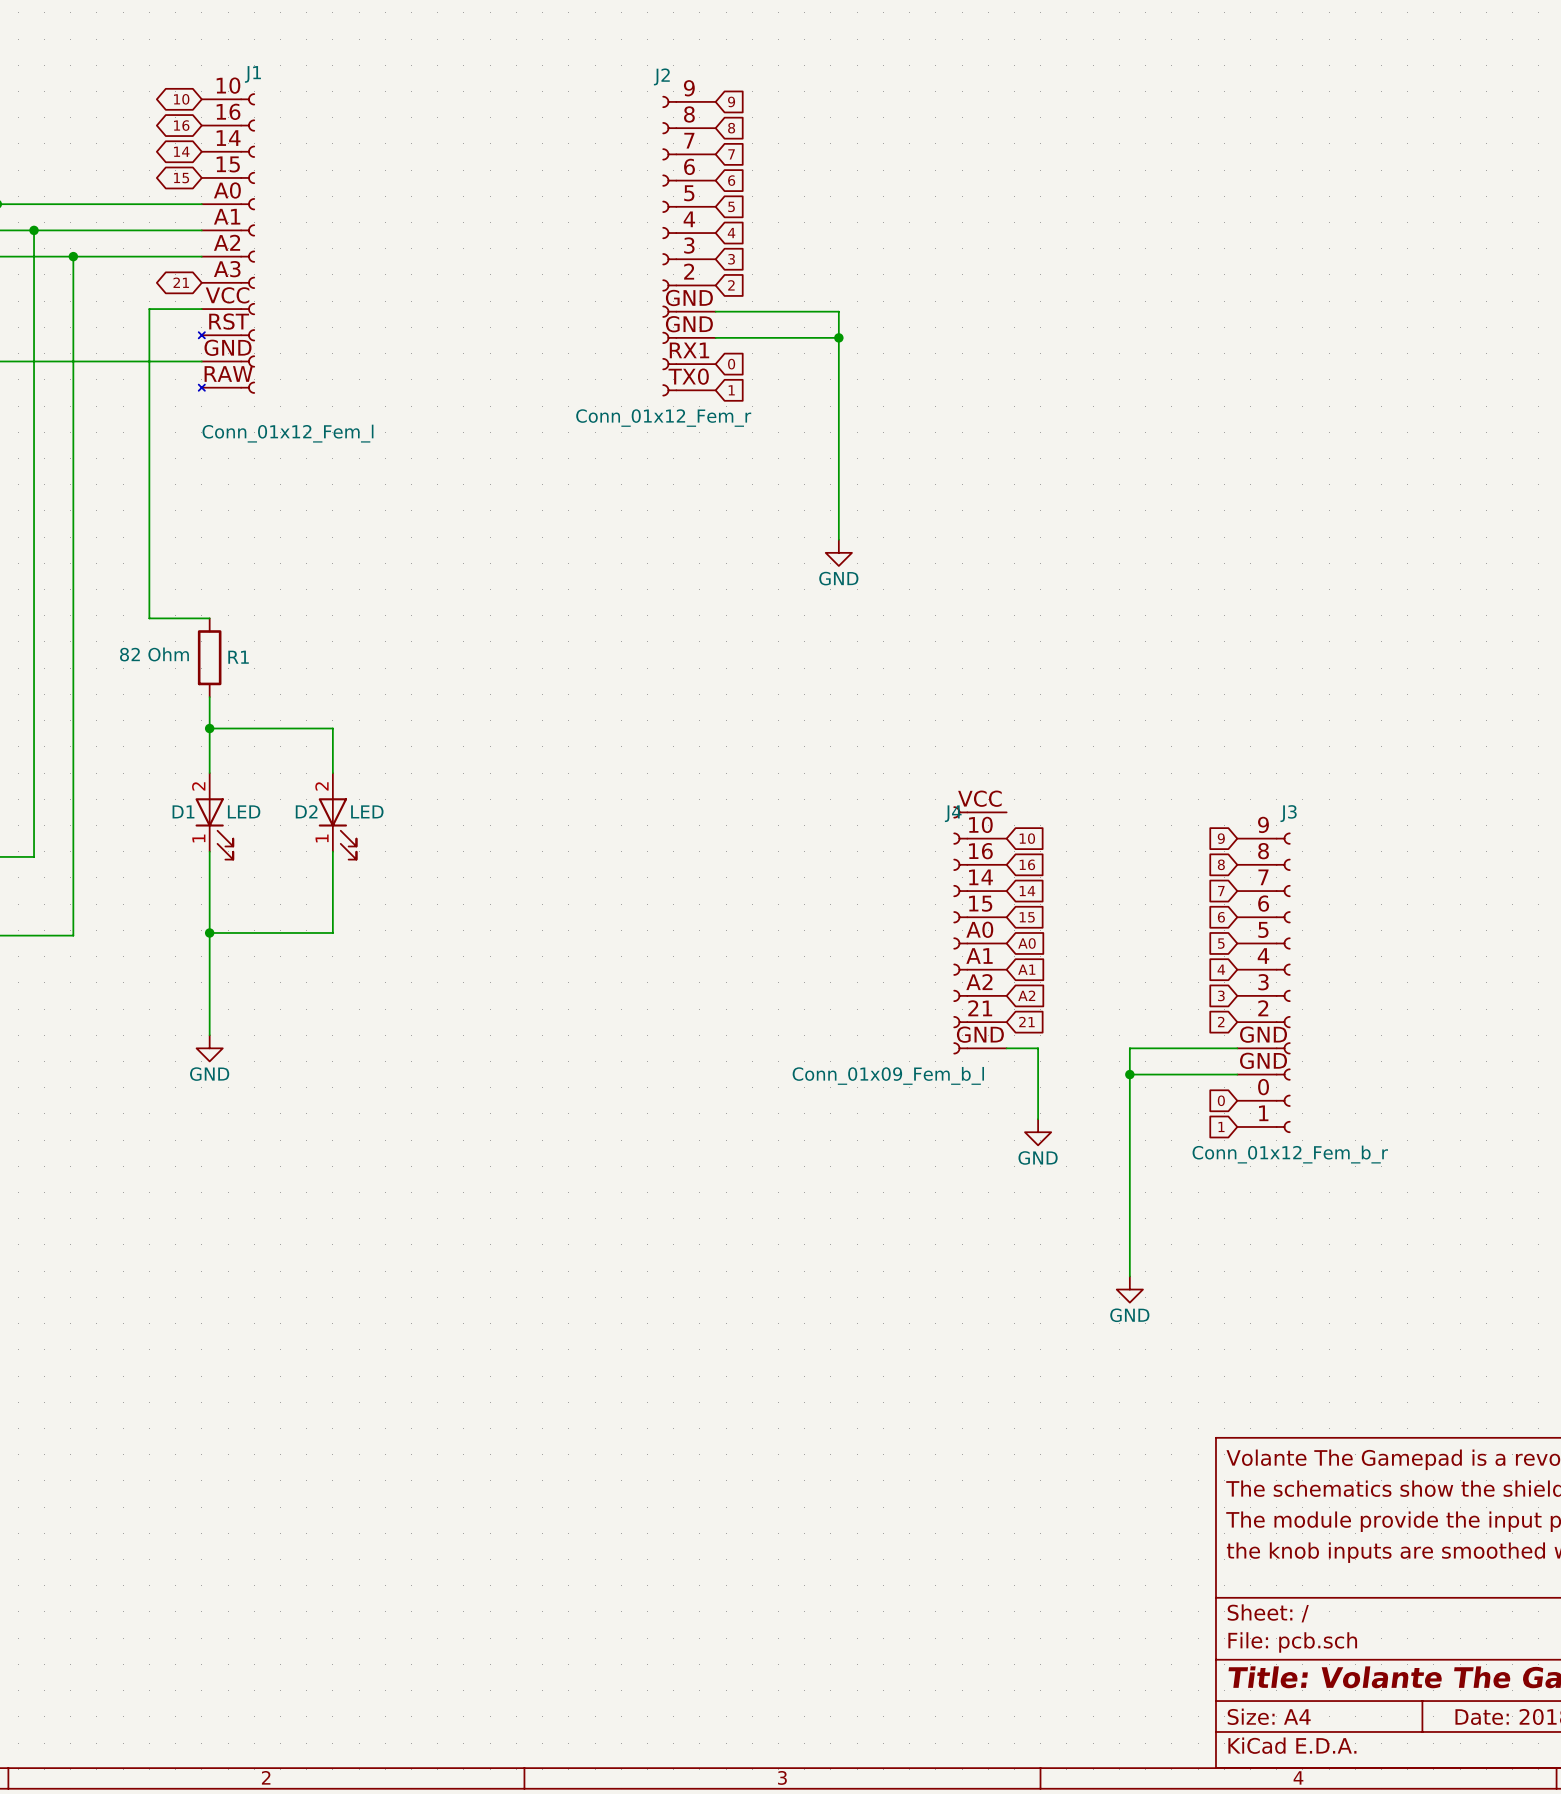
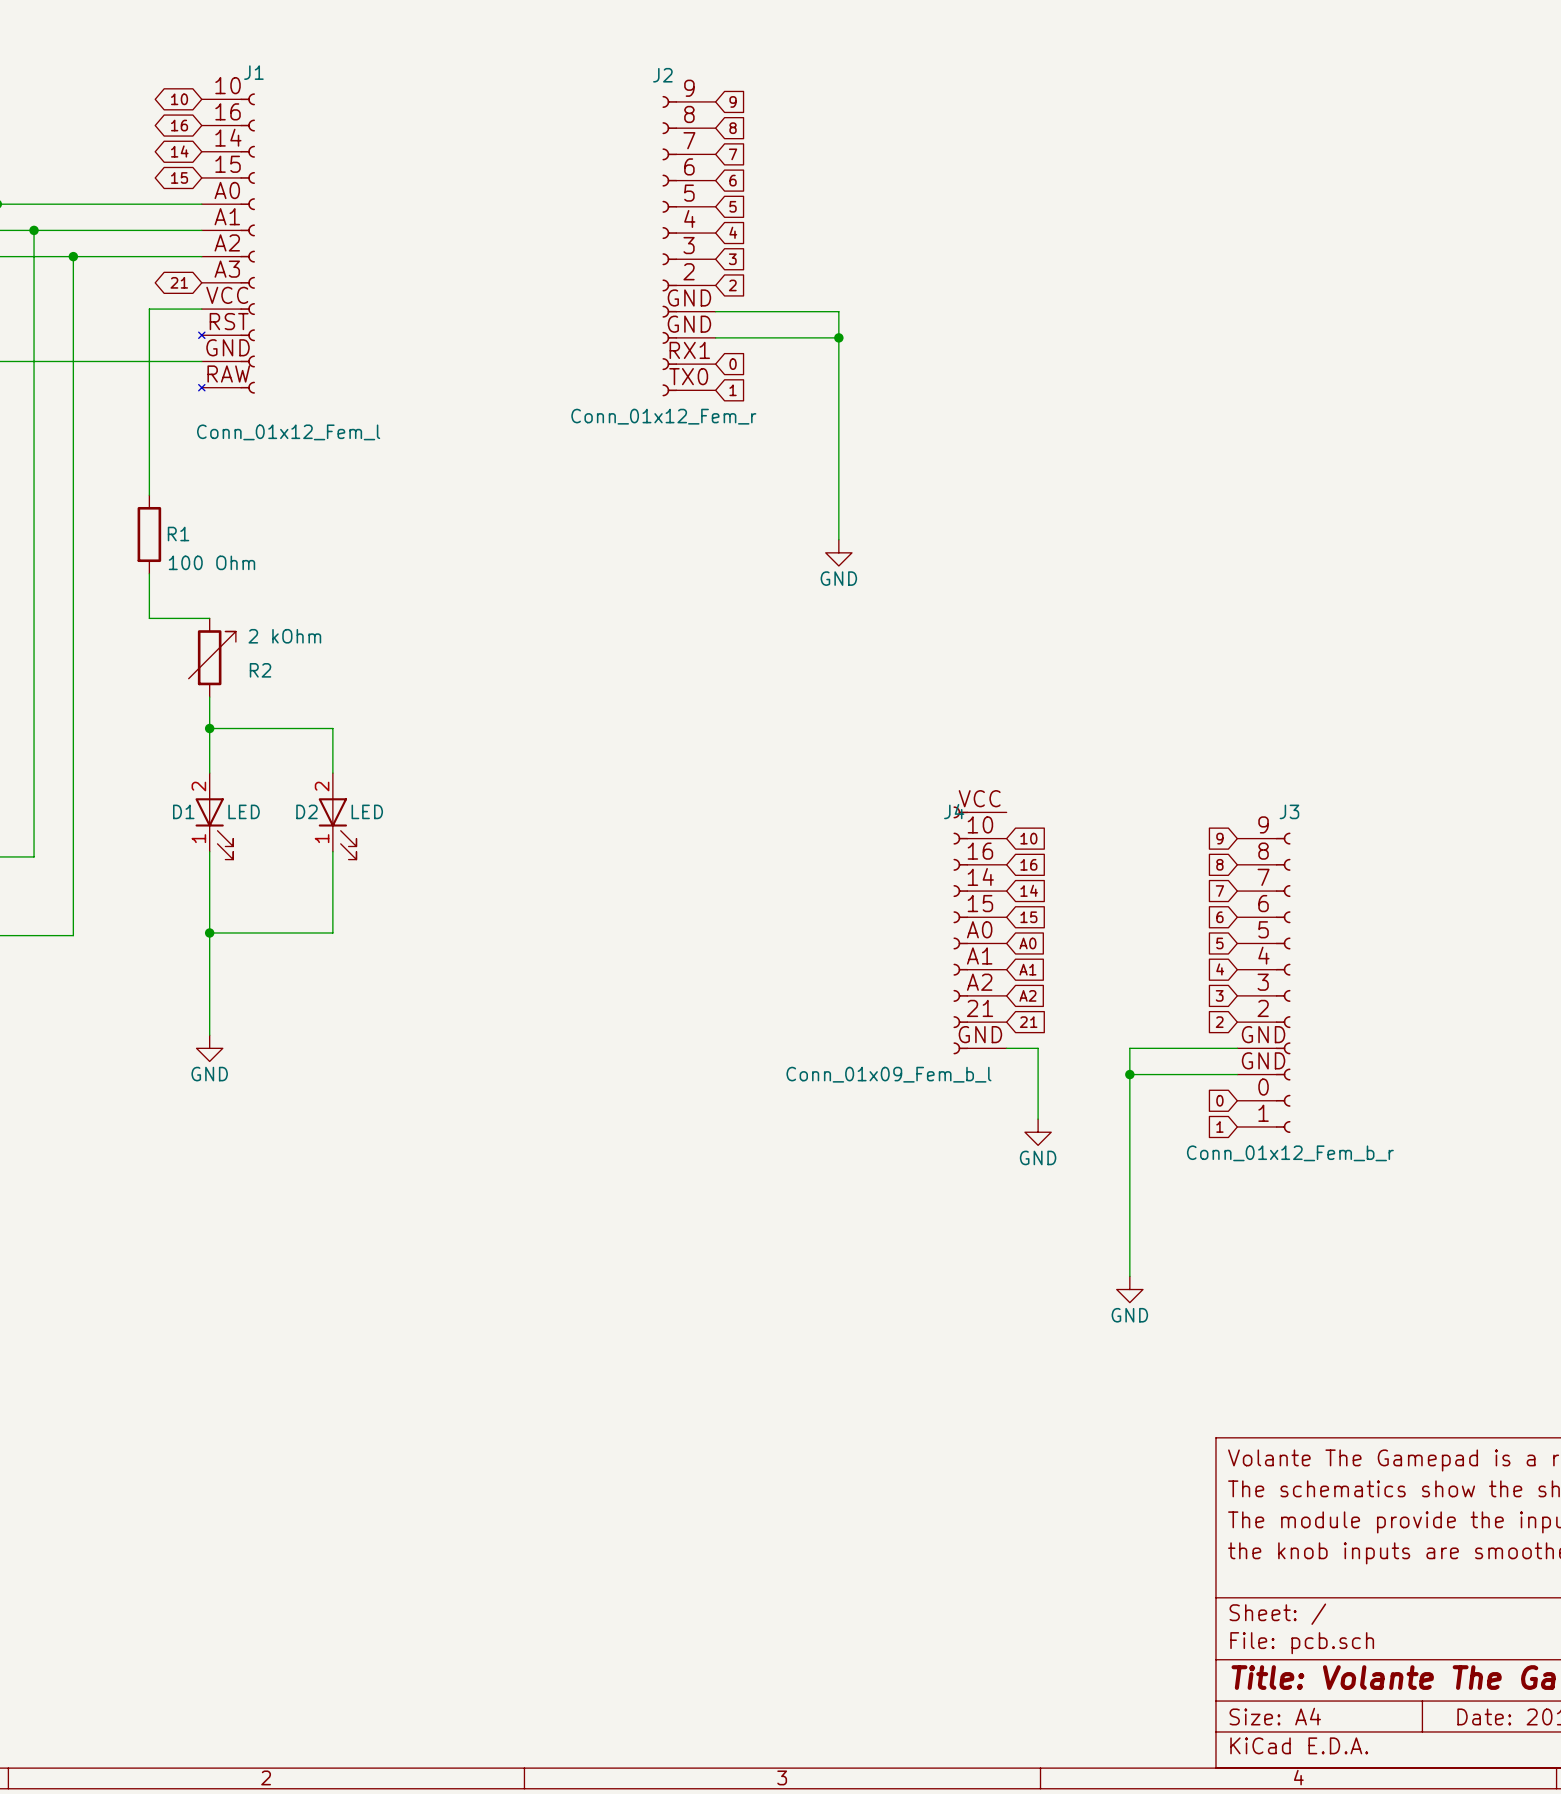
wire: (149, 495) (149, 573) -> none
R1 value: 82 Ohm (154, 654) -> 100 Ohm (211, 562)
R1 position: (209, 657) -> (149, 534)
R2: none -> 2 kOhm (212, 657)

